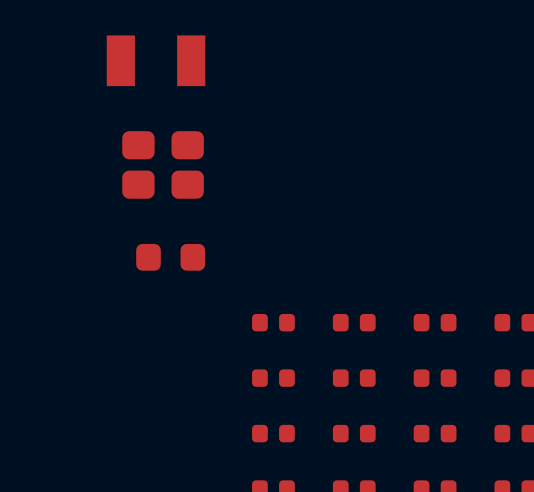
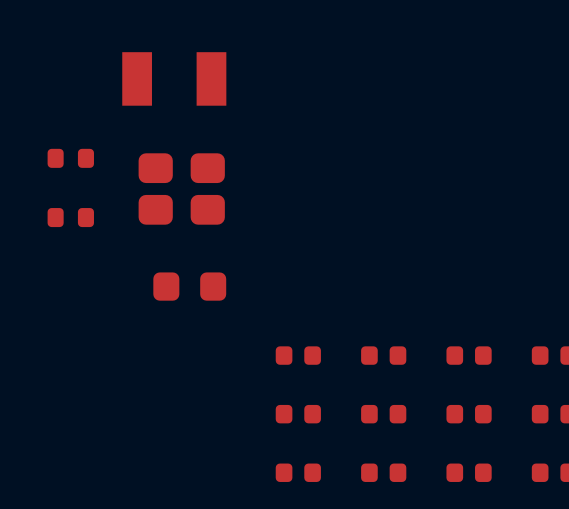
part: none -> (70, 158)
part: none -> (70, 217)

